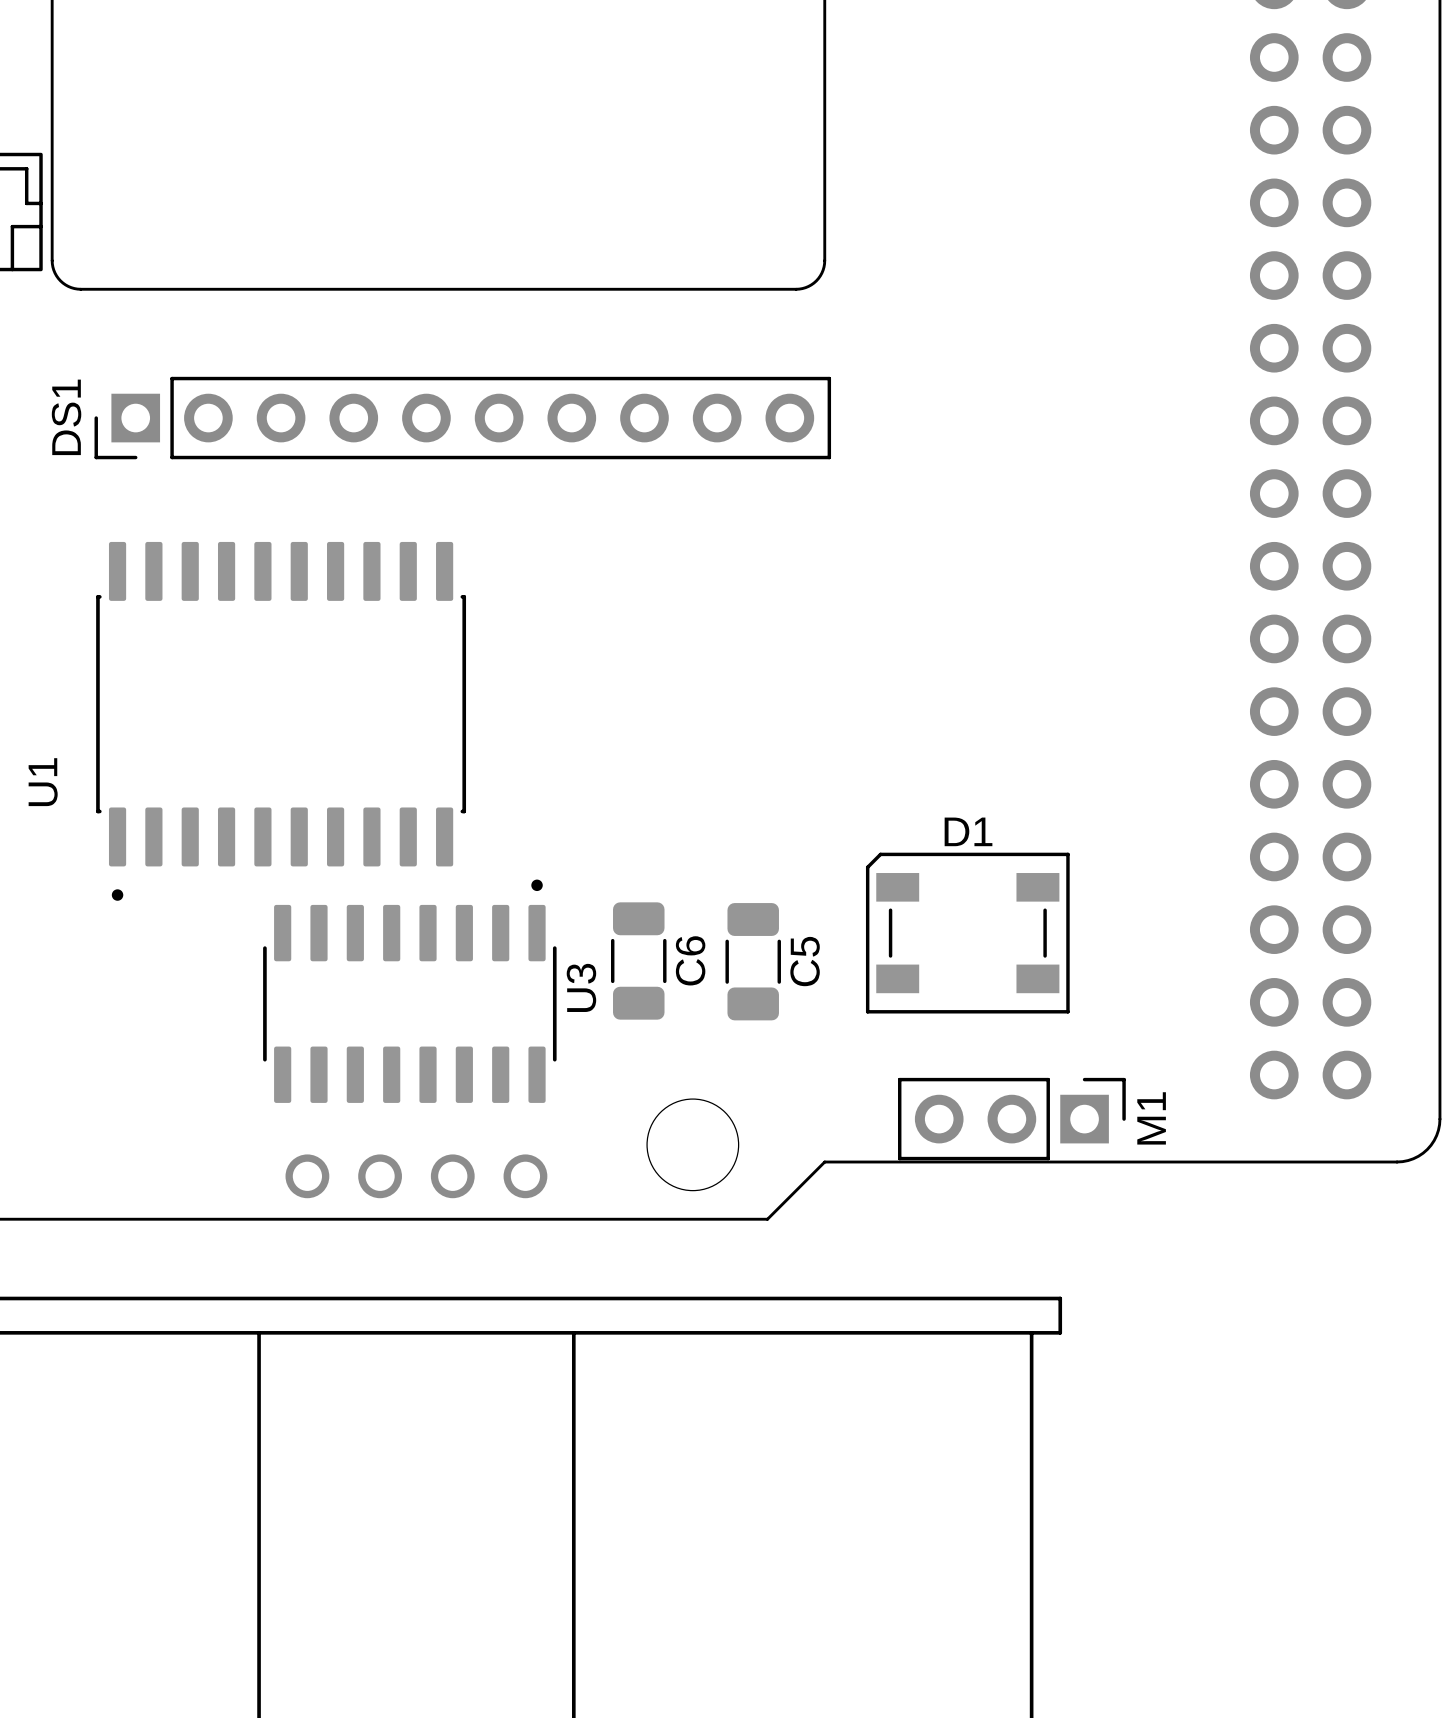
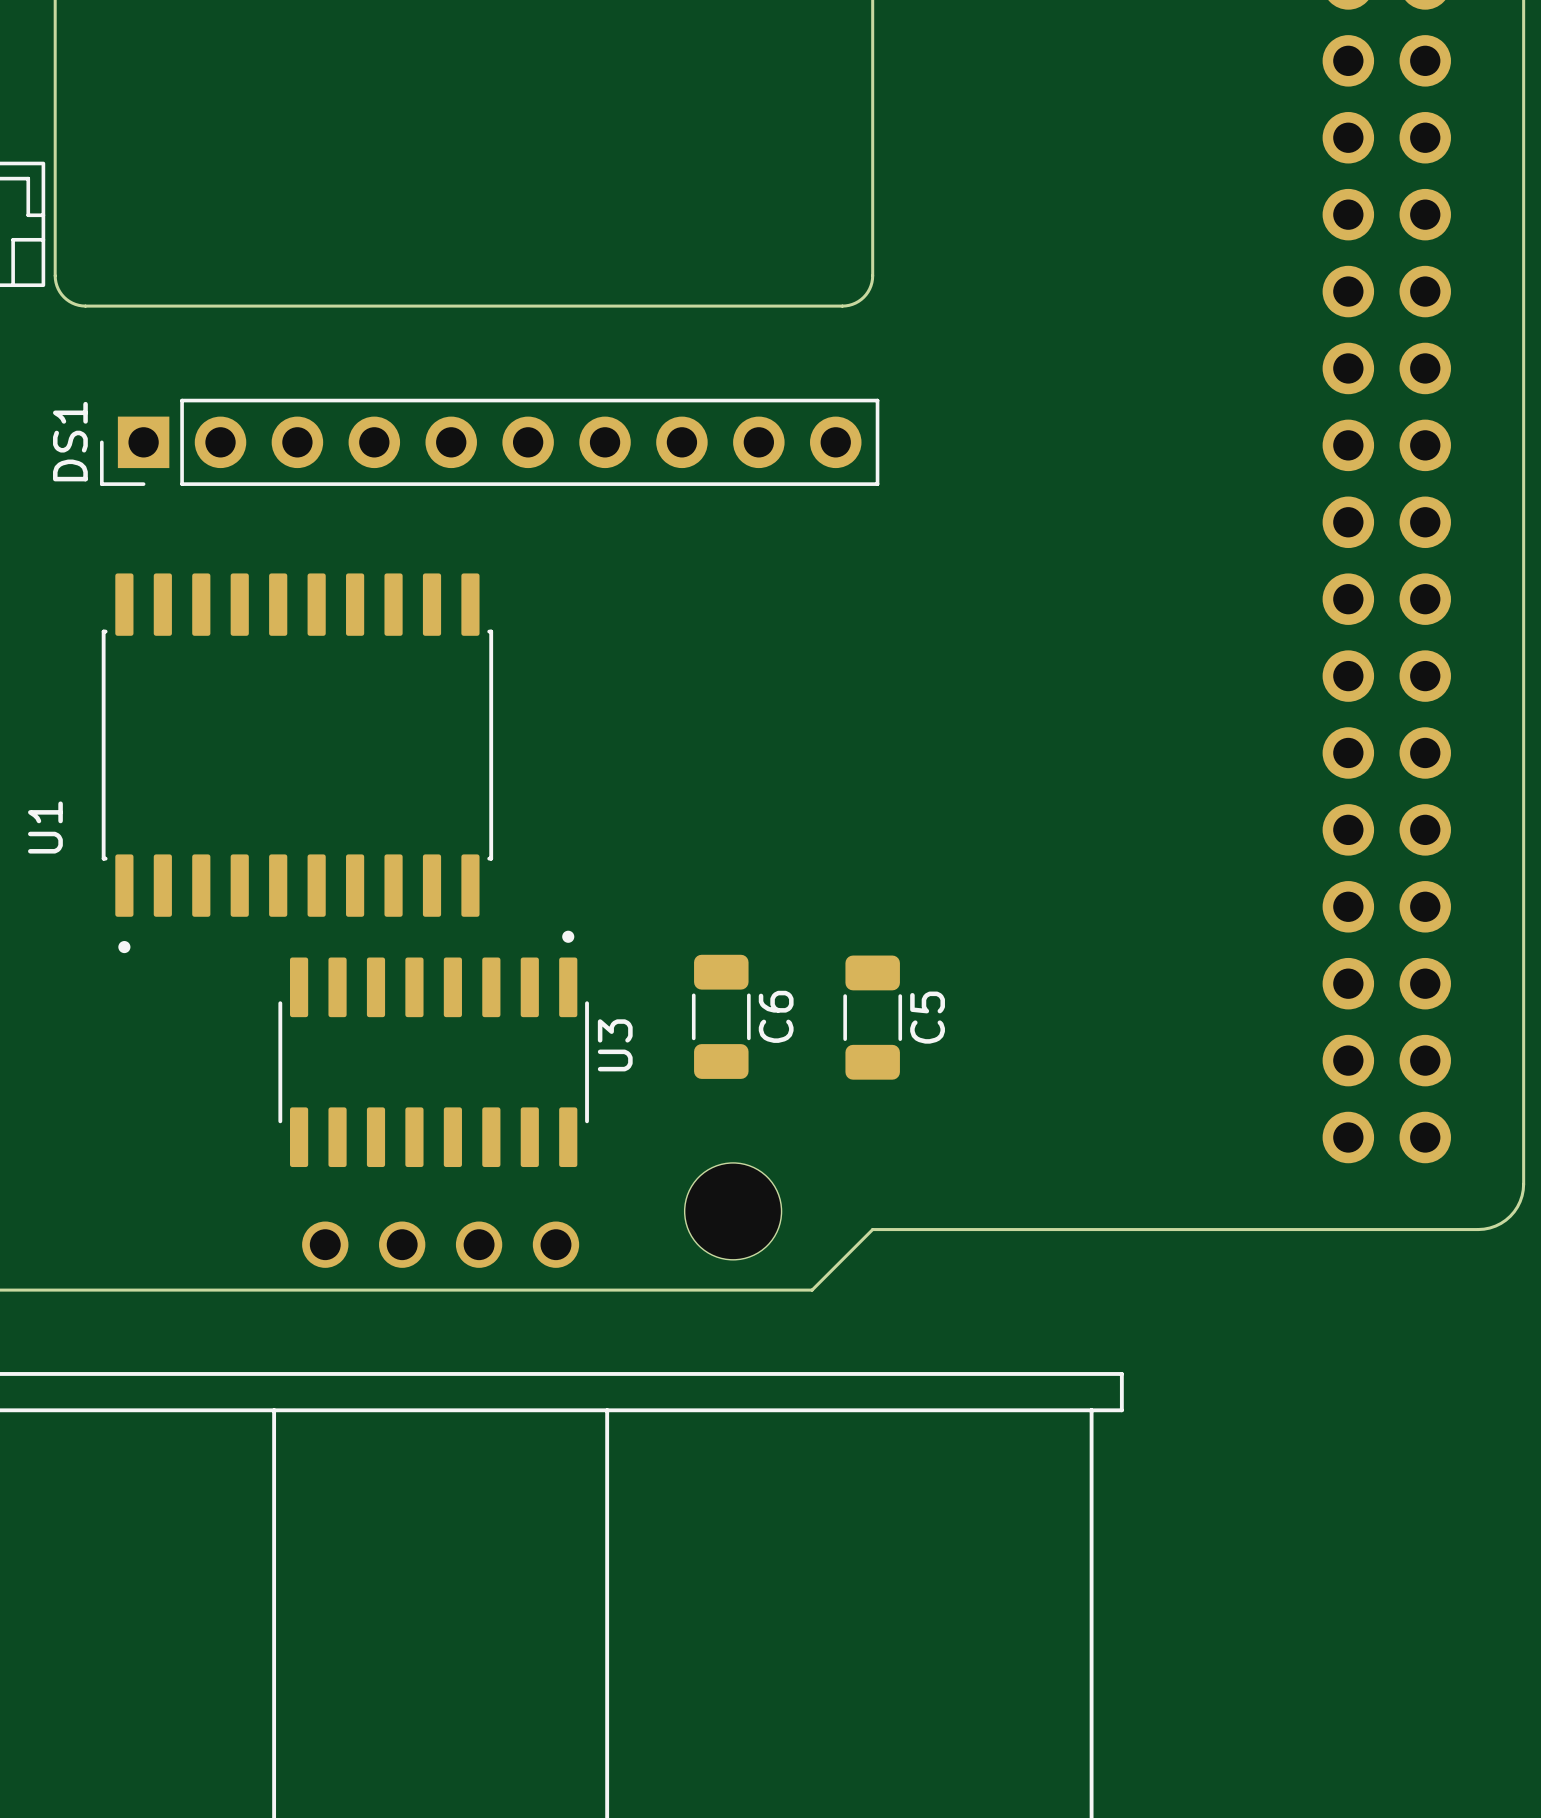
D1: (967, 933) -> none
C6 position: (638, 960) -> (721, 1016)
C5 position: (753, 961) -> (872, 1017)
M1: (1011, 1119) -> none

